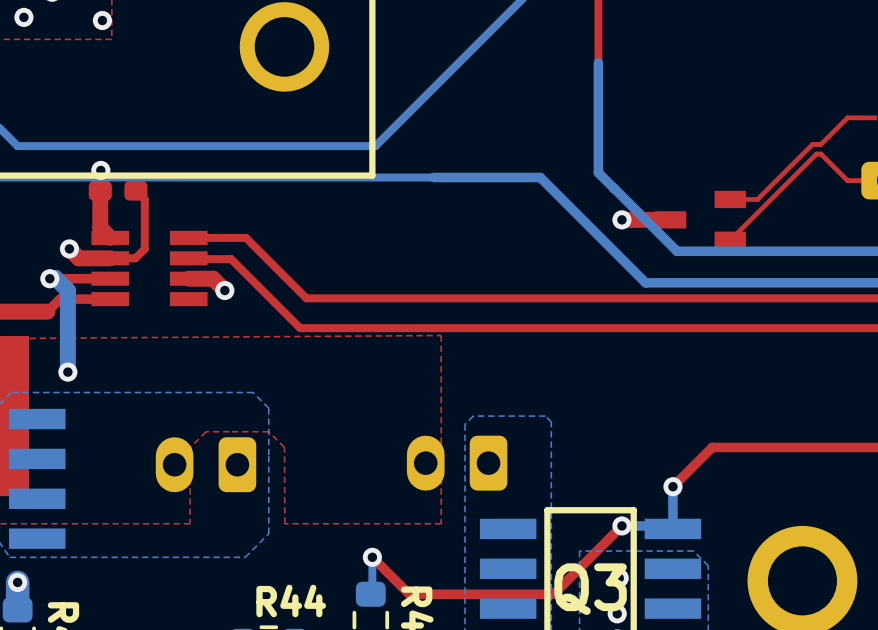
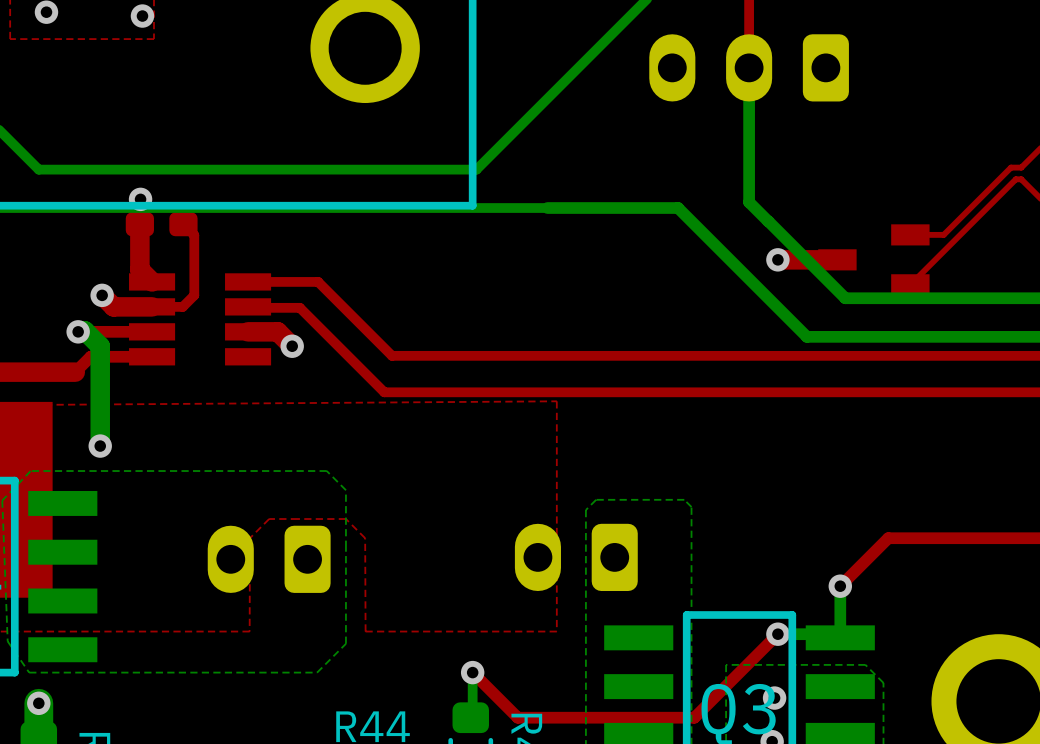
part: none -> (749, 67)

